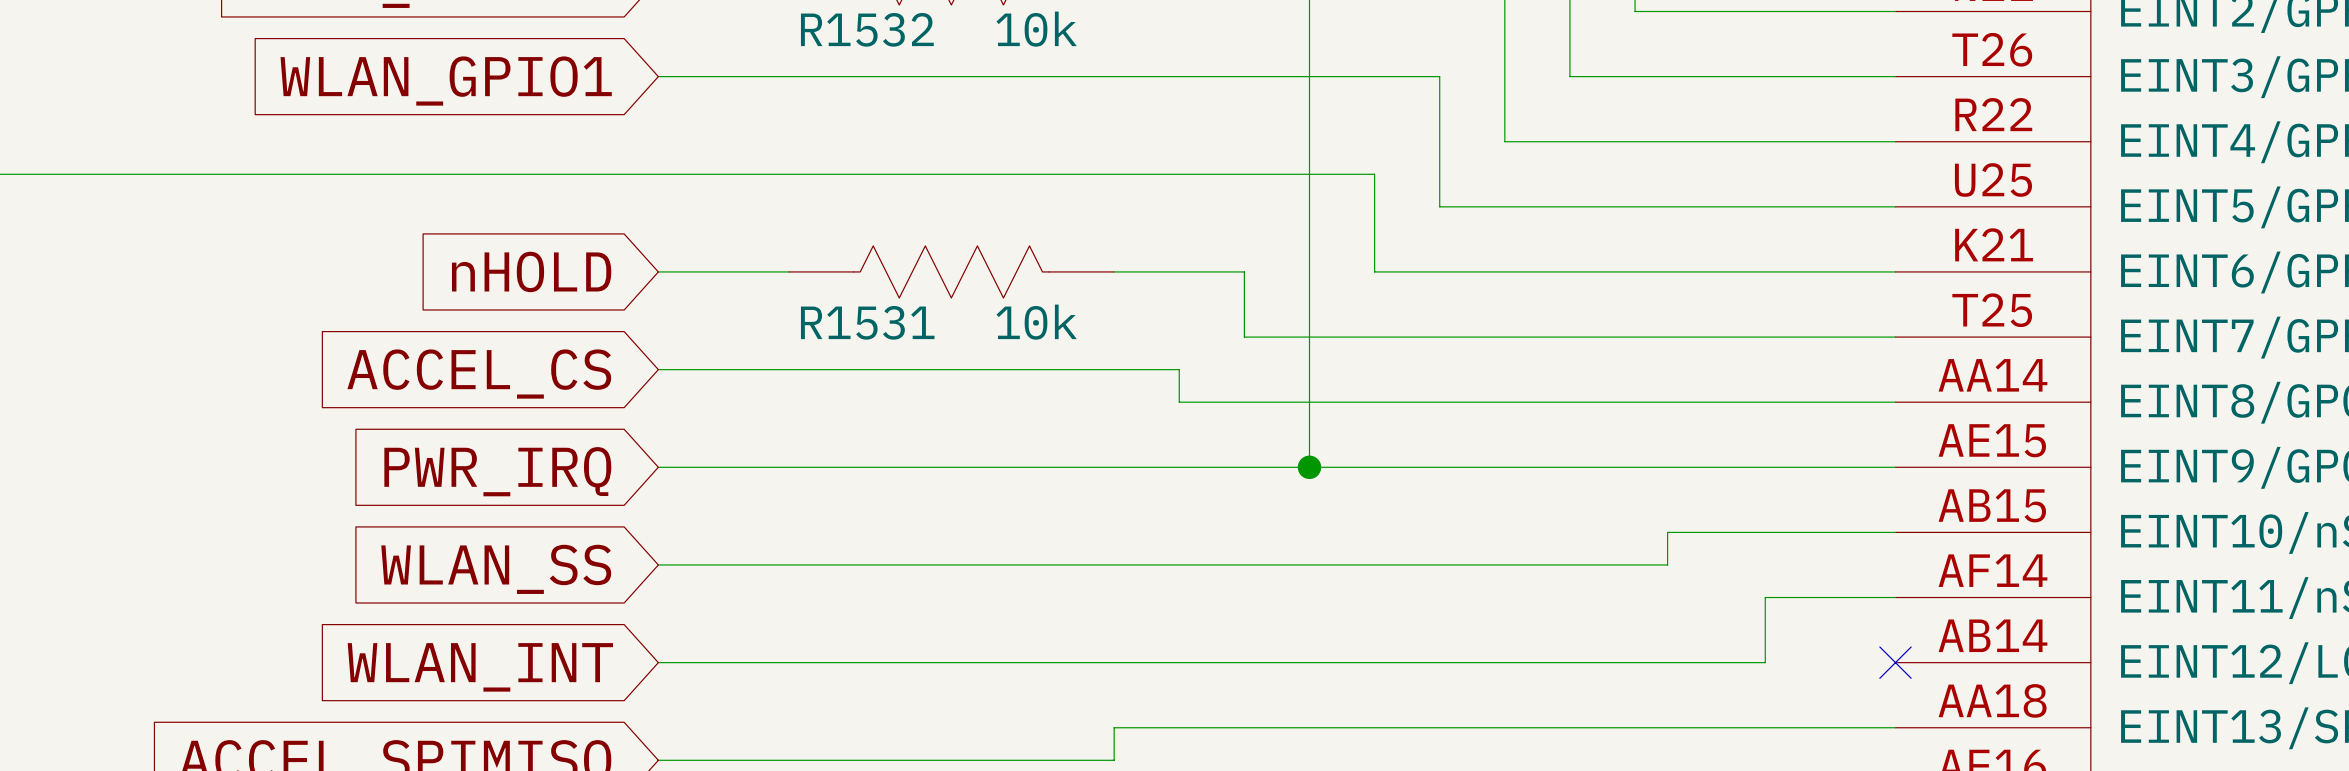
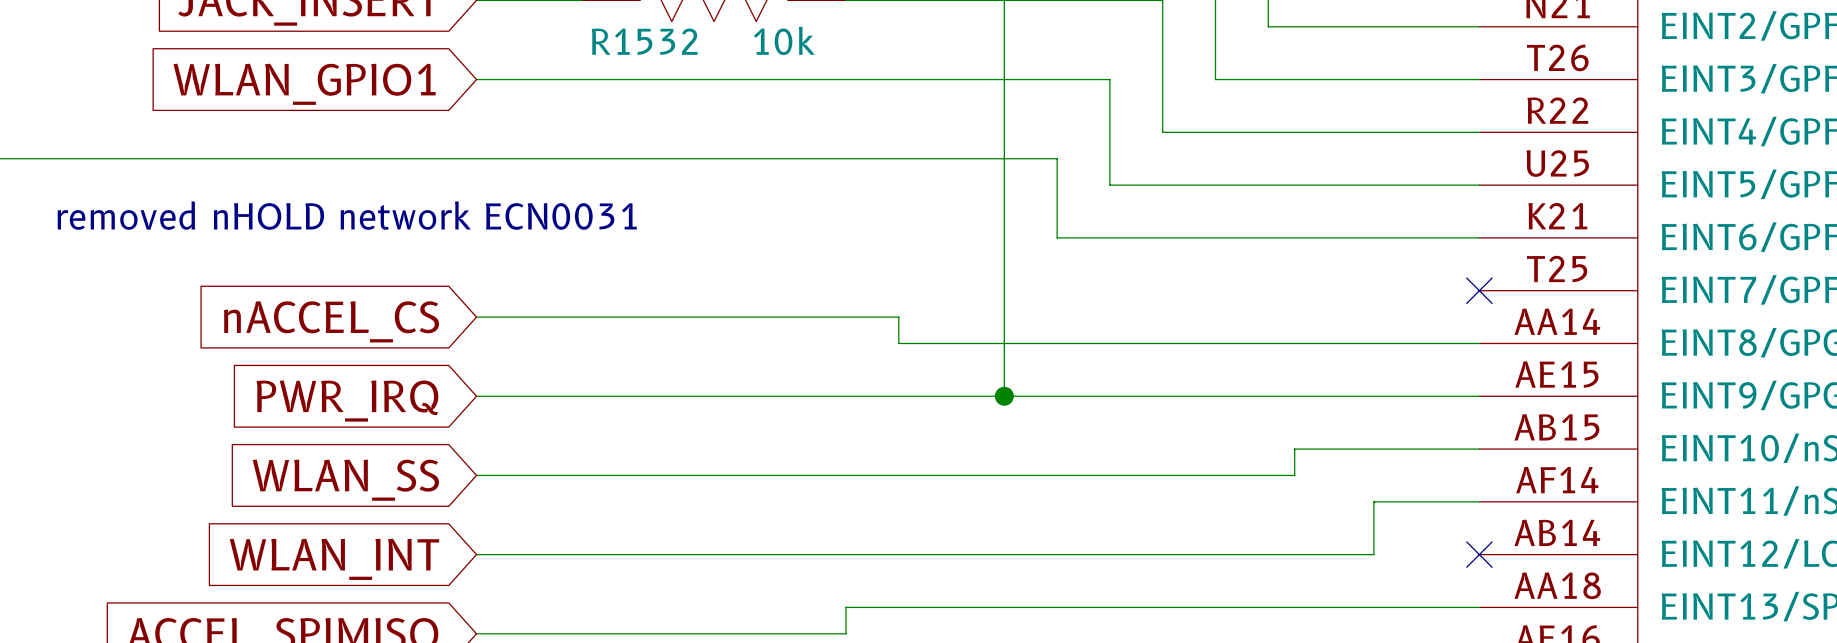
text: none -> removed nHOLD network ECN0031 (347, 215)
global label: nHOLD (531, 271) -> none
wire: (658, 271) (788, 271) -> none
R1531: 10k (951, 271) -> none
wire: (1114, 271) (1244, 271) (1244, 337) (1895, 337) -> none
no-connect mark: none -> (1479, 290)
global label: ACCEL_CS (479, 374) -> nACCEL_CS (331, 321)

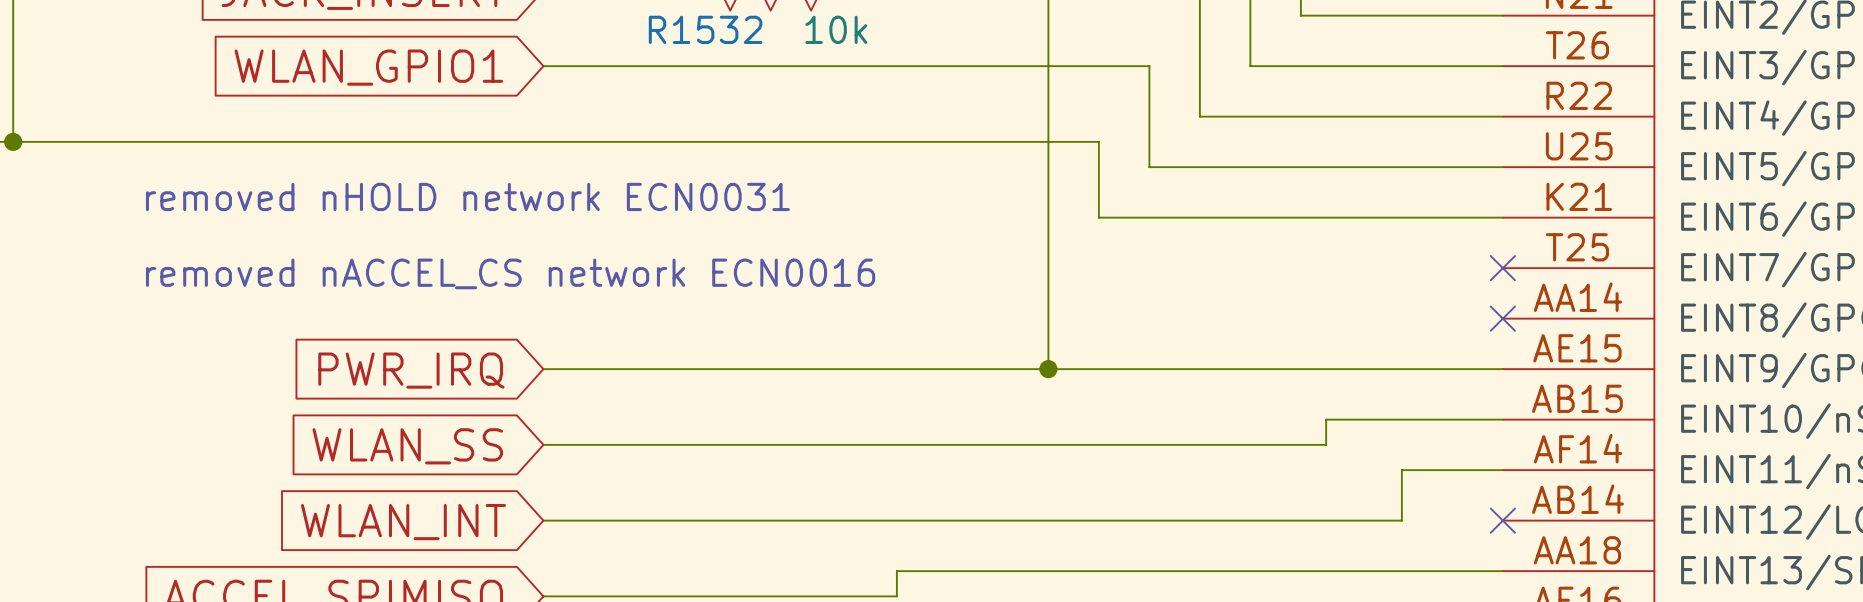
text: none -> removed nACCEL_CS network ECN0016 (510, 273)
wire: (476, 317) (898, 317) (898, 343) (1479, 343) -> none
global label: nACCEL_CS (331, 321) -> none
no-connect mark: none -> (1502, 318)

